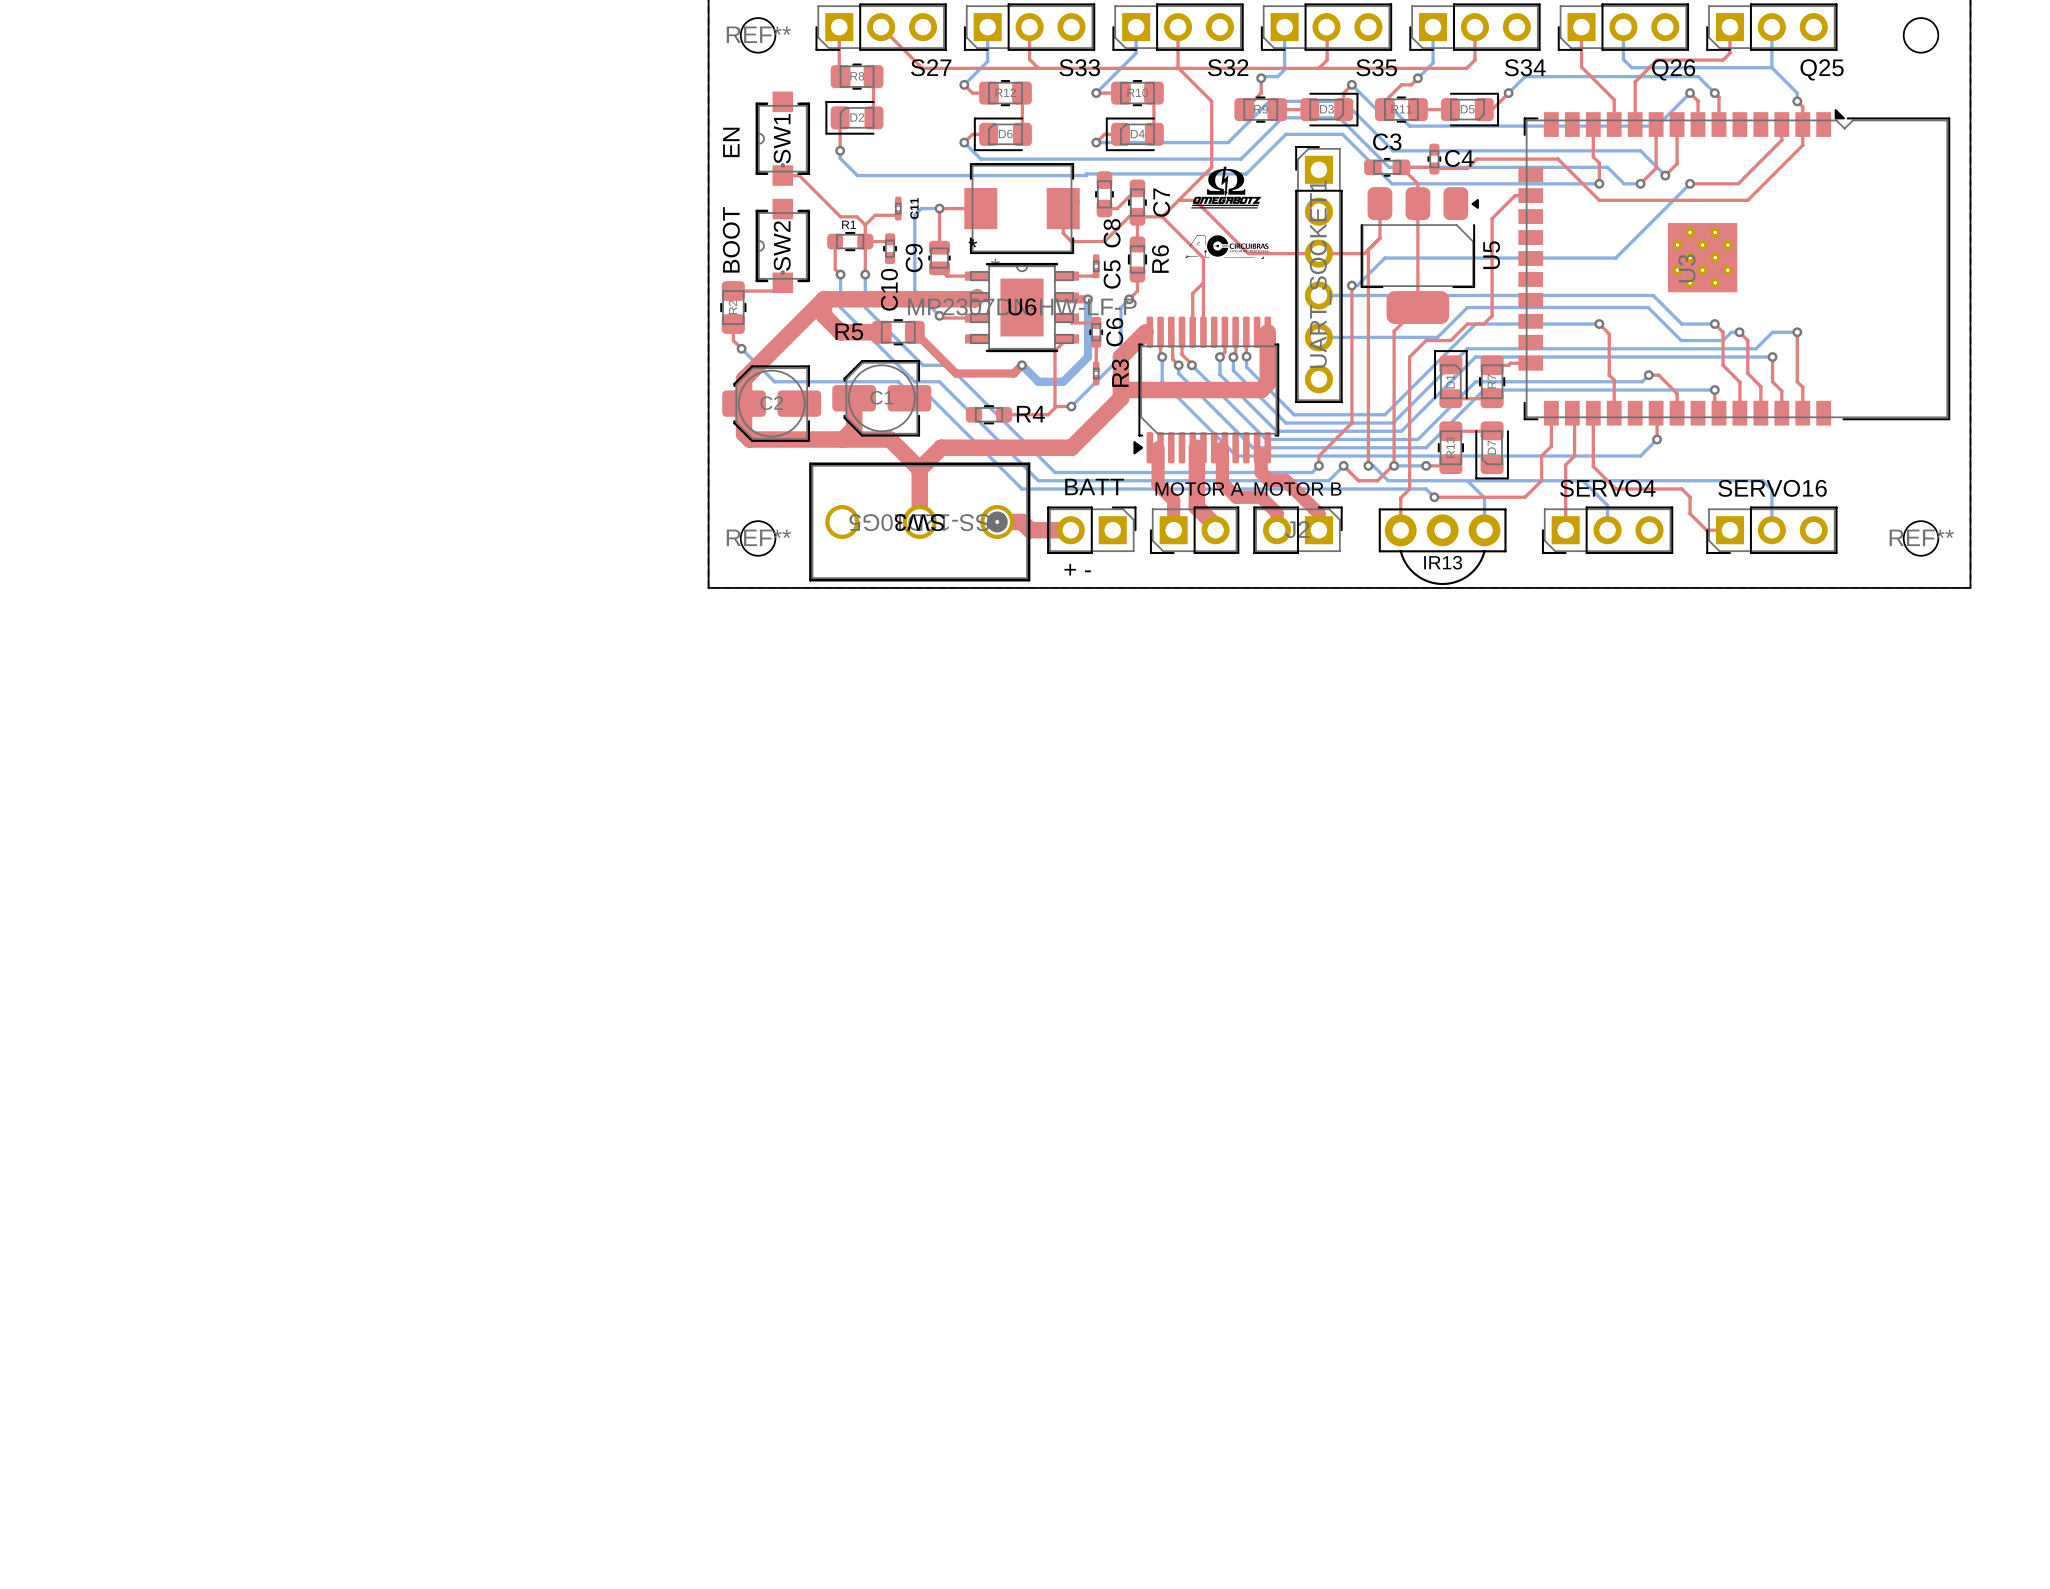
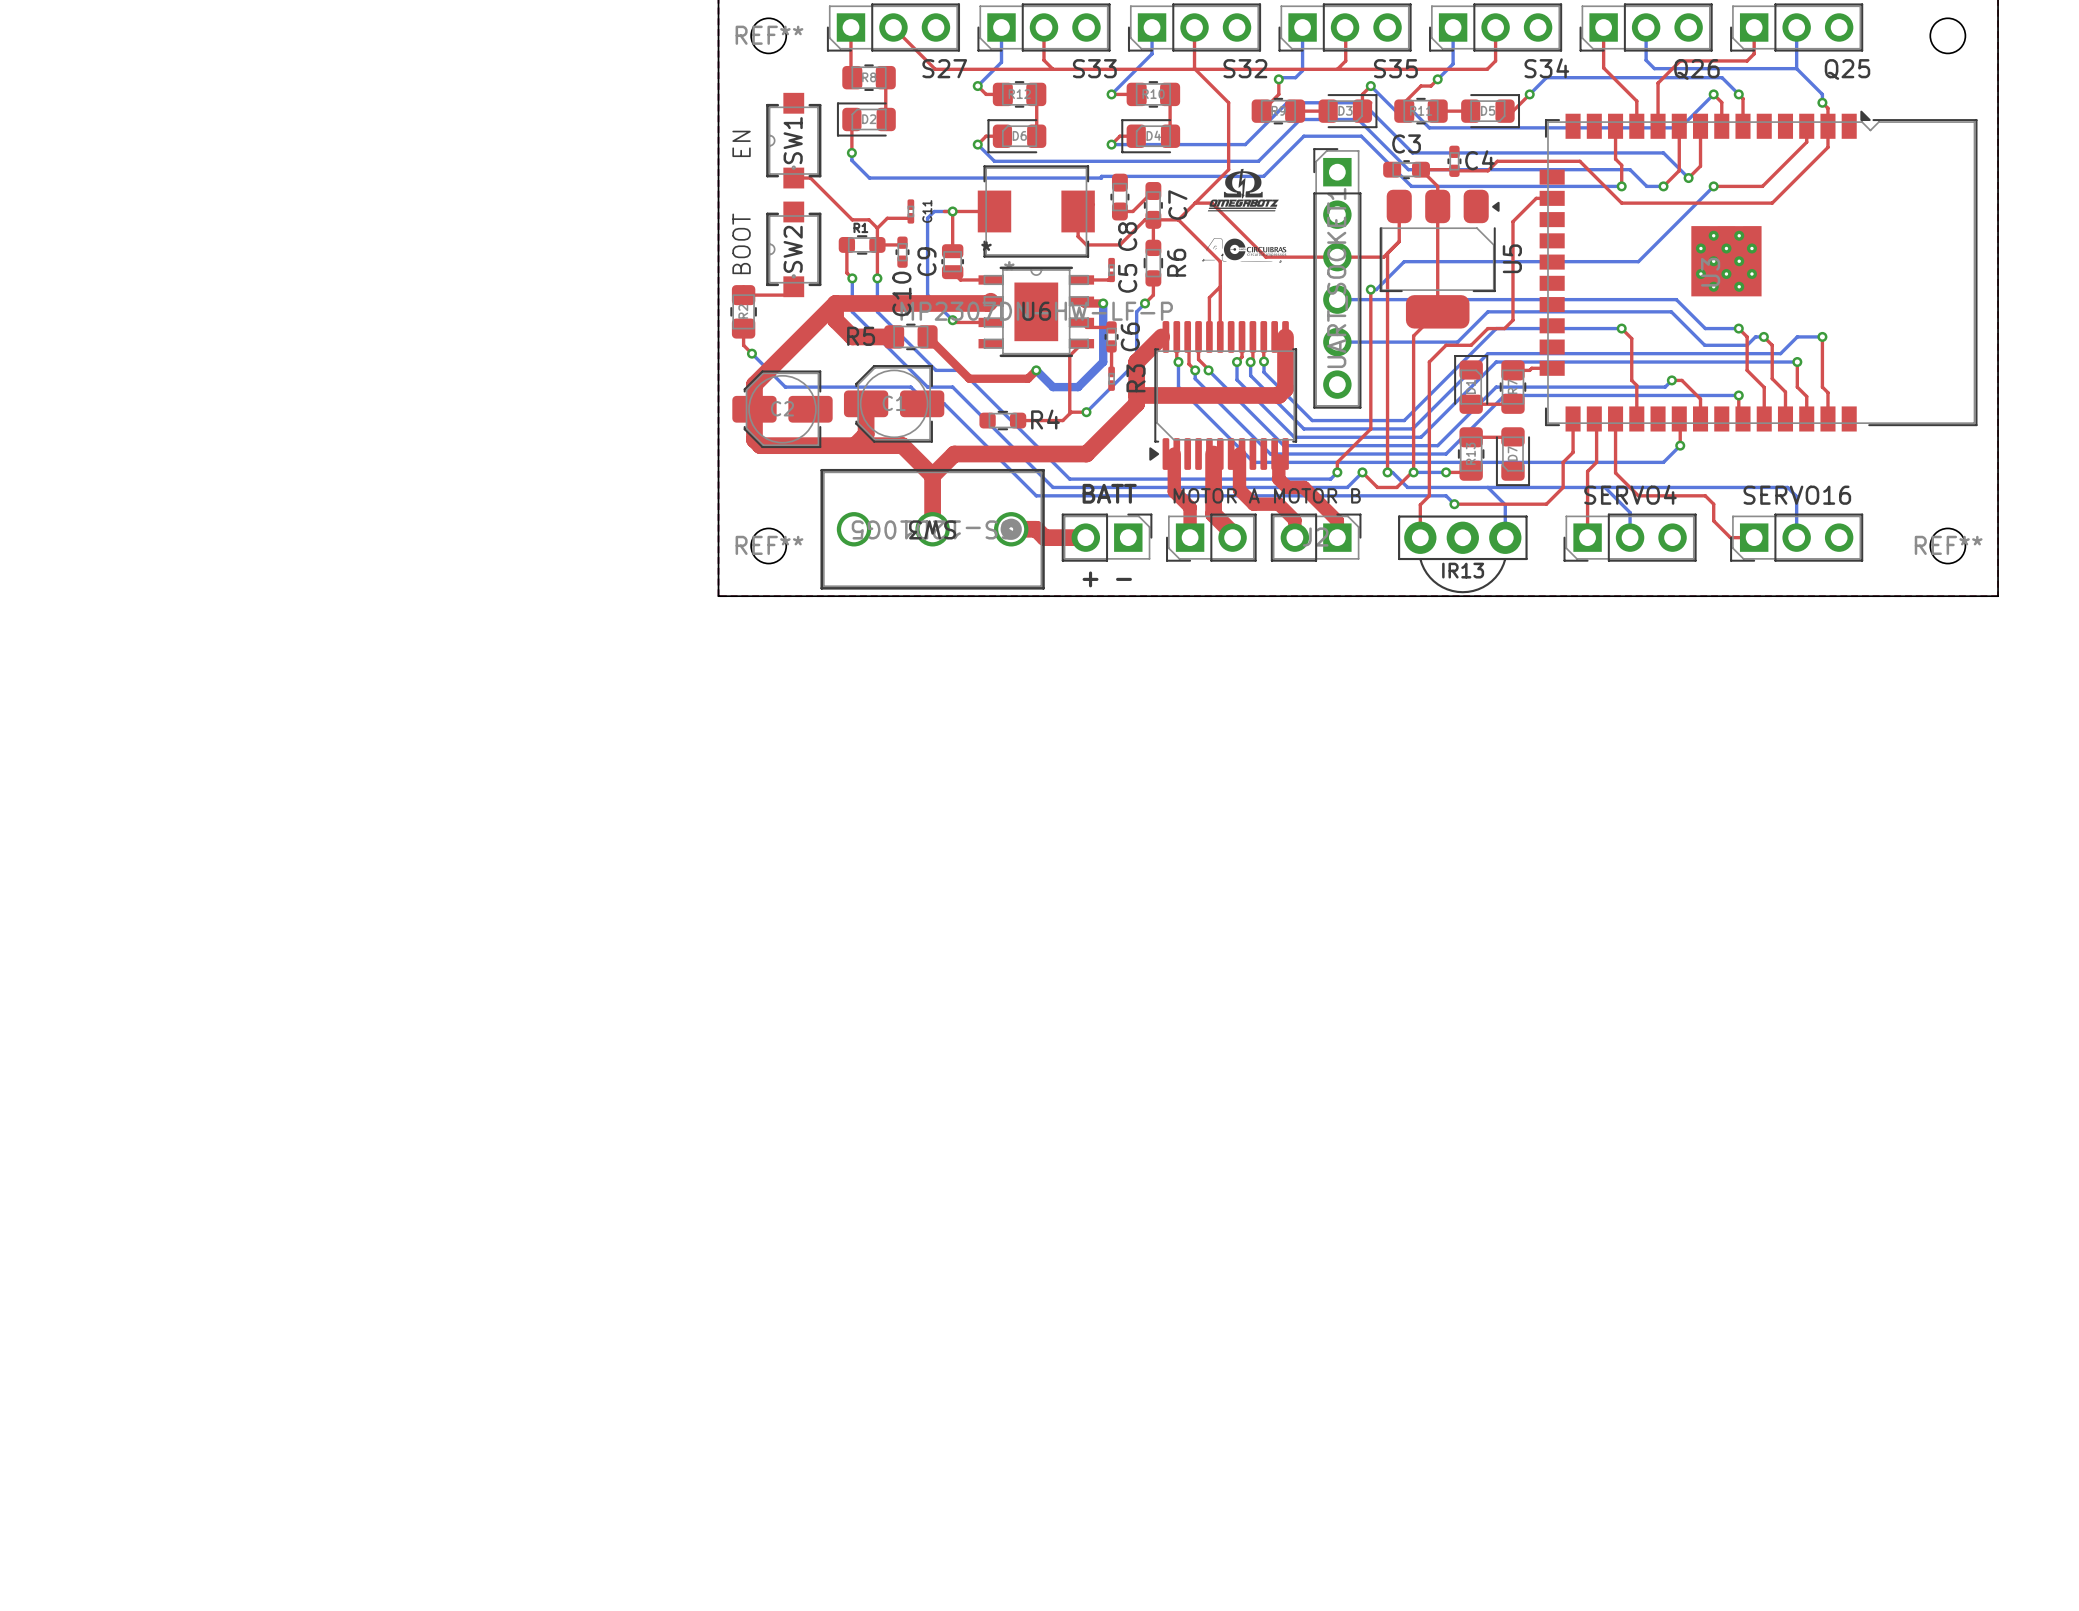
top track: none -> (944, 211) (952, 211)

